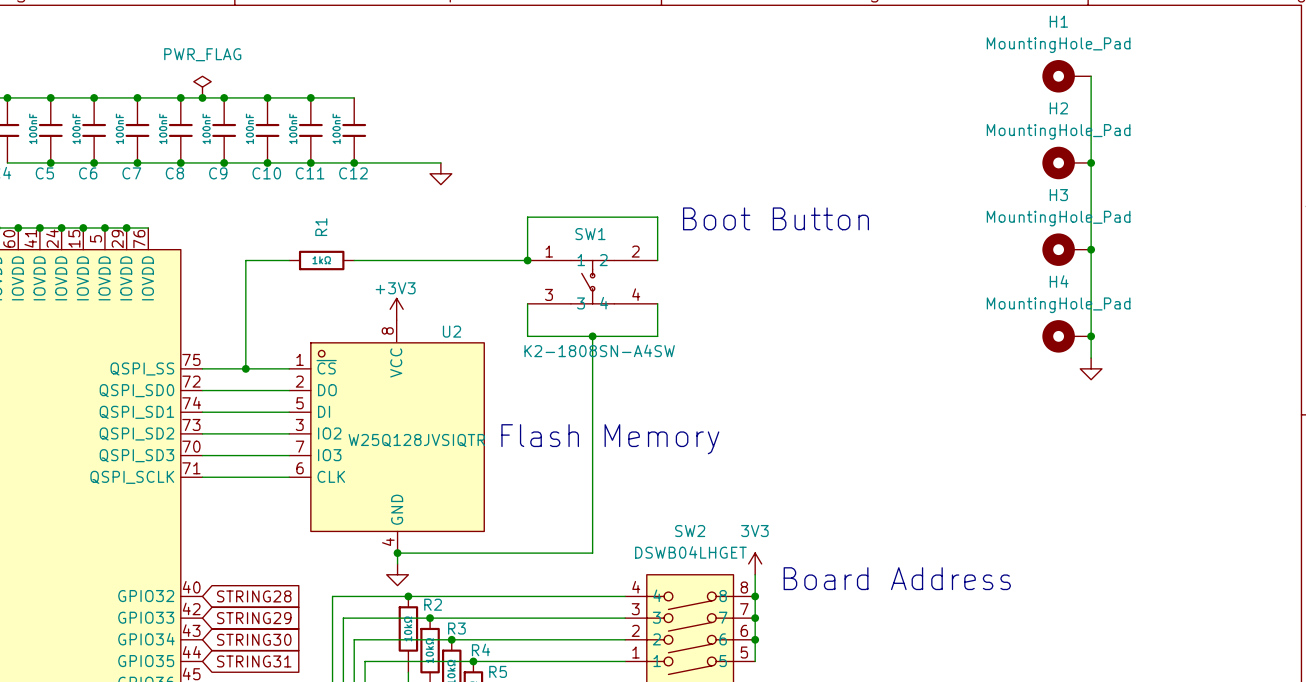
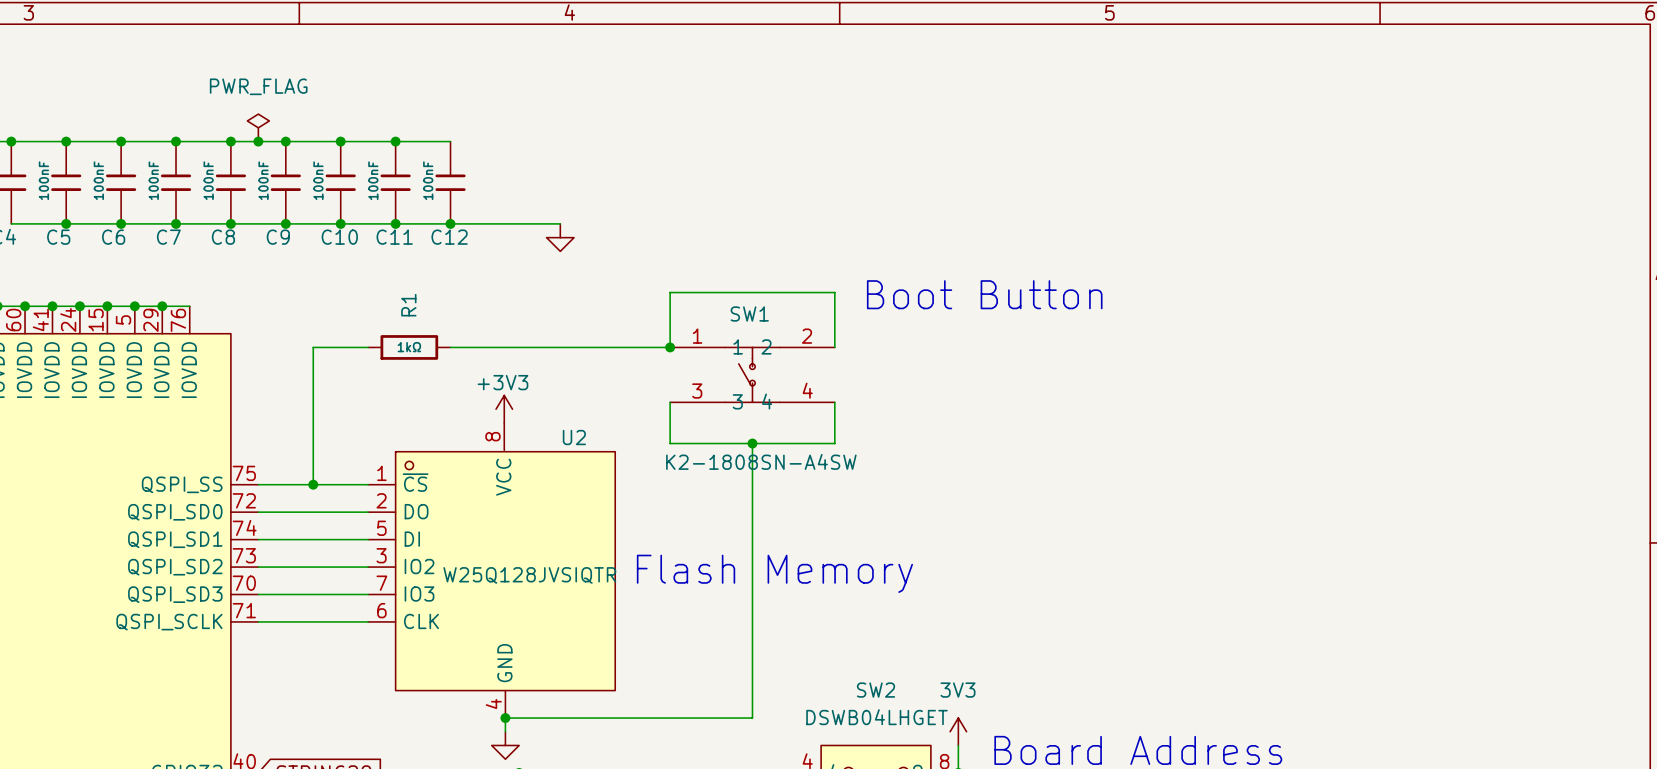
H1: MountingHole_Pad (1066, 76) -> none
wire: (1091, 76) (1091, 358) -> none
H2: MountingHole_Pad (1066, 162) -> none
junction: (1091, 162) -> none
H3: MountingHole_Pad (1066, 249) -> none
junction: (1091, 249) -> none
H4: MountingHole_Pad (1066, 336) -> none
junction: (1091, 336) -> none
power symbol: (1091, 368) -> none

